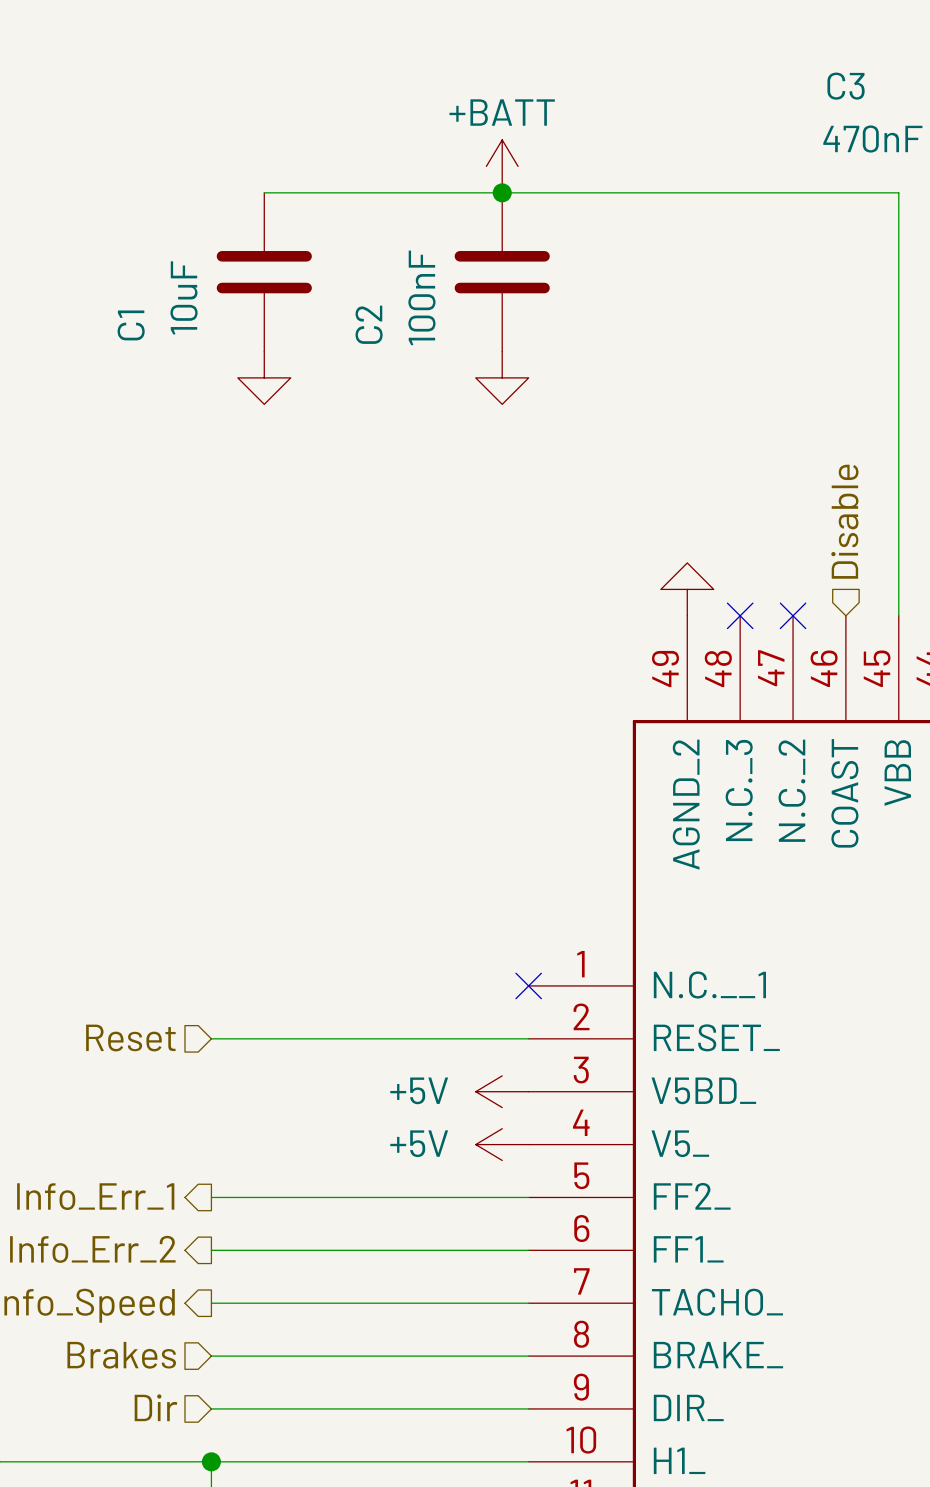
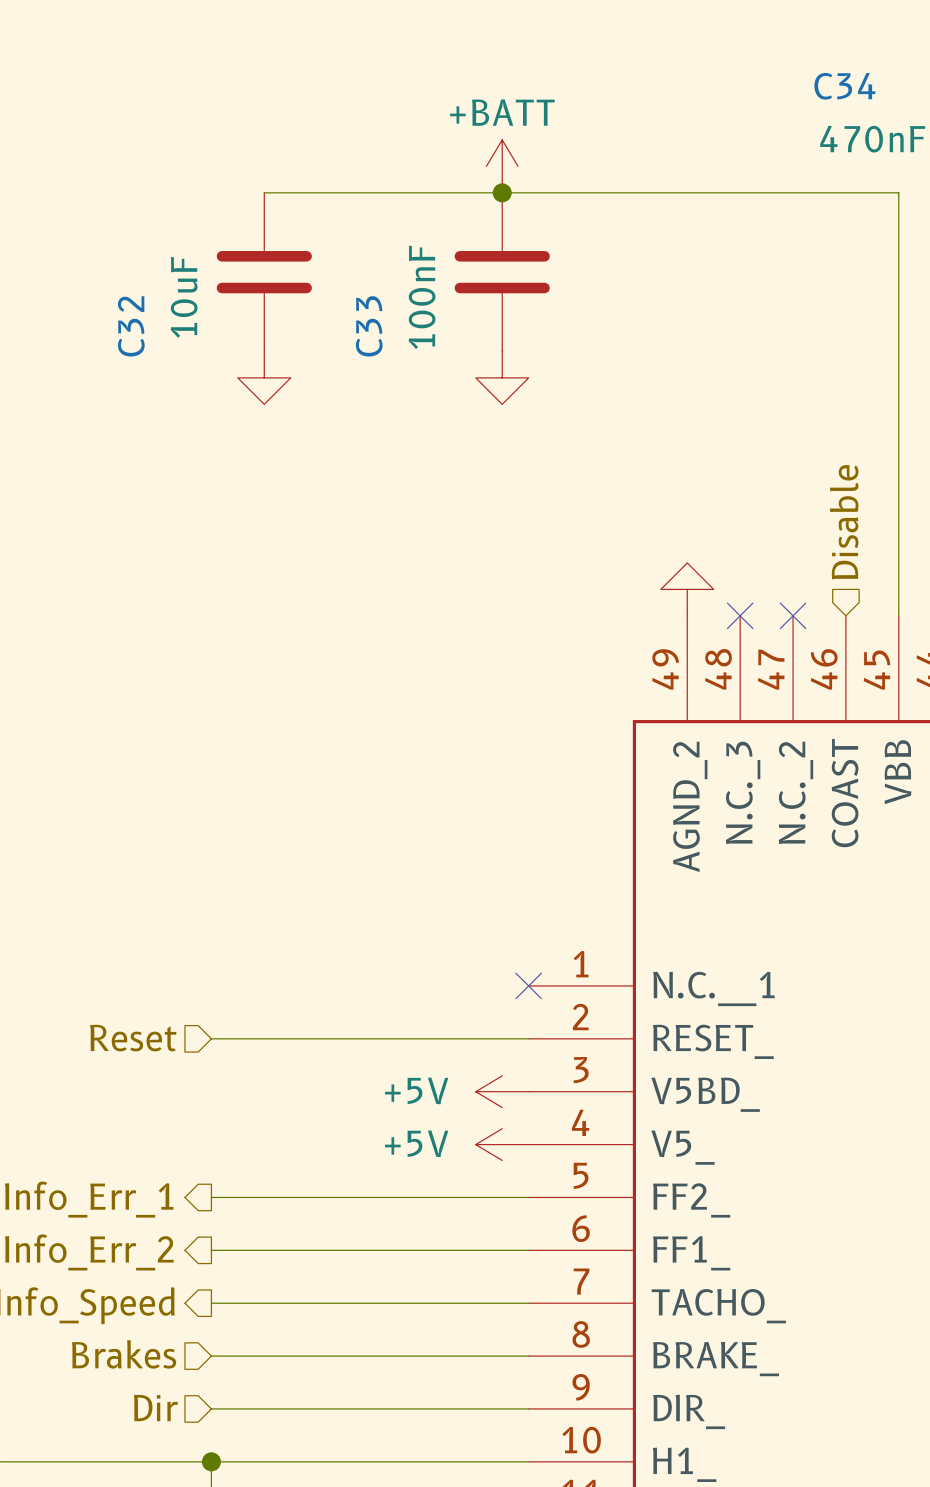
C3 name: C3 (846, 86) -> C34 (844, 86)
C2 name: C2 (369, 324) -> C33 (369, 326)
C1 name: C1 (131, 325) -> C32 (131, 326)

